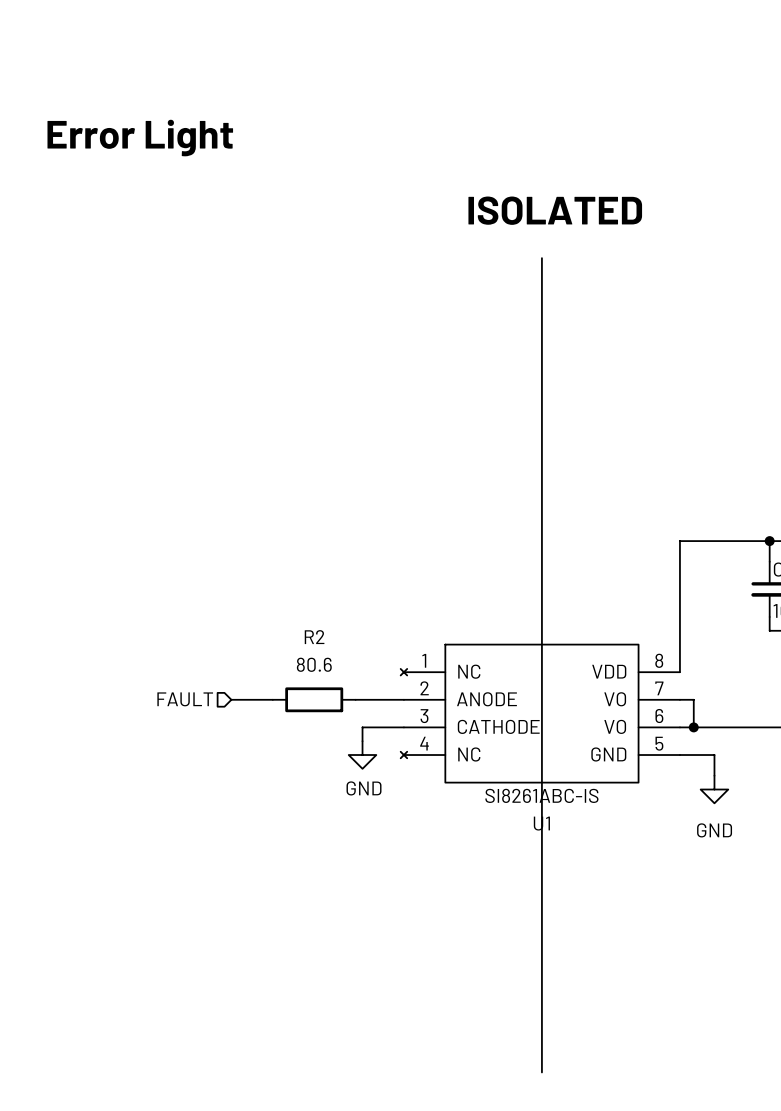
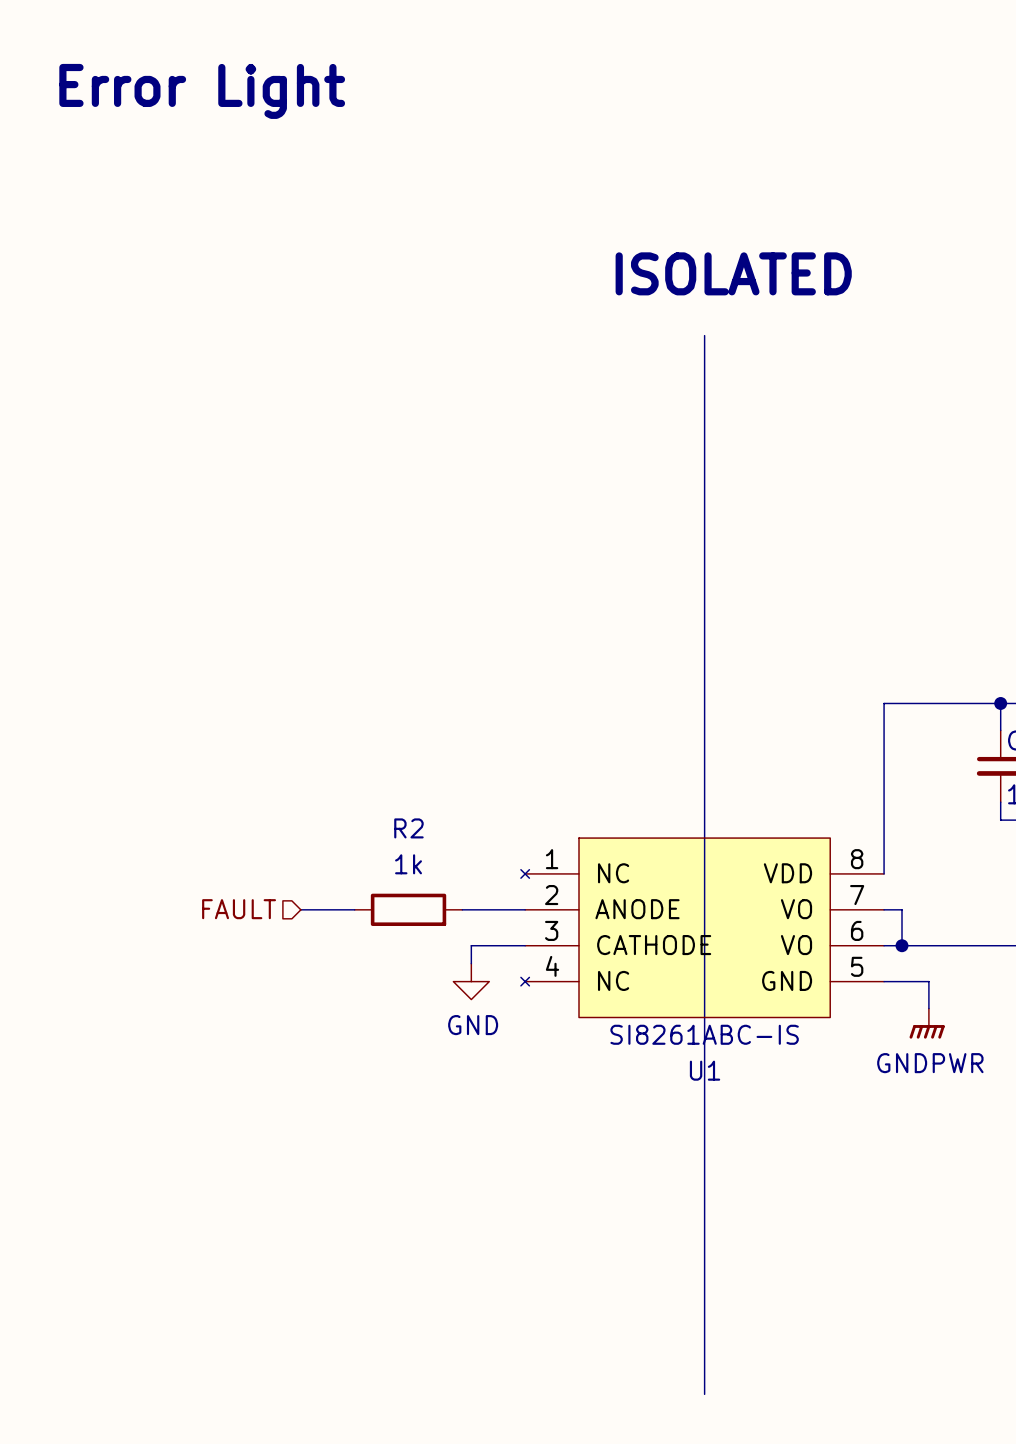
text position: Error Light (140, 138) -> Error Light (202, 91)
R2 value: 80.6 (314, 664) -> 1k (408, 864)
power symbol: GND (714, 789) -> GNDPWR (927, 1023)

